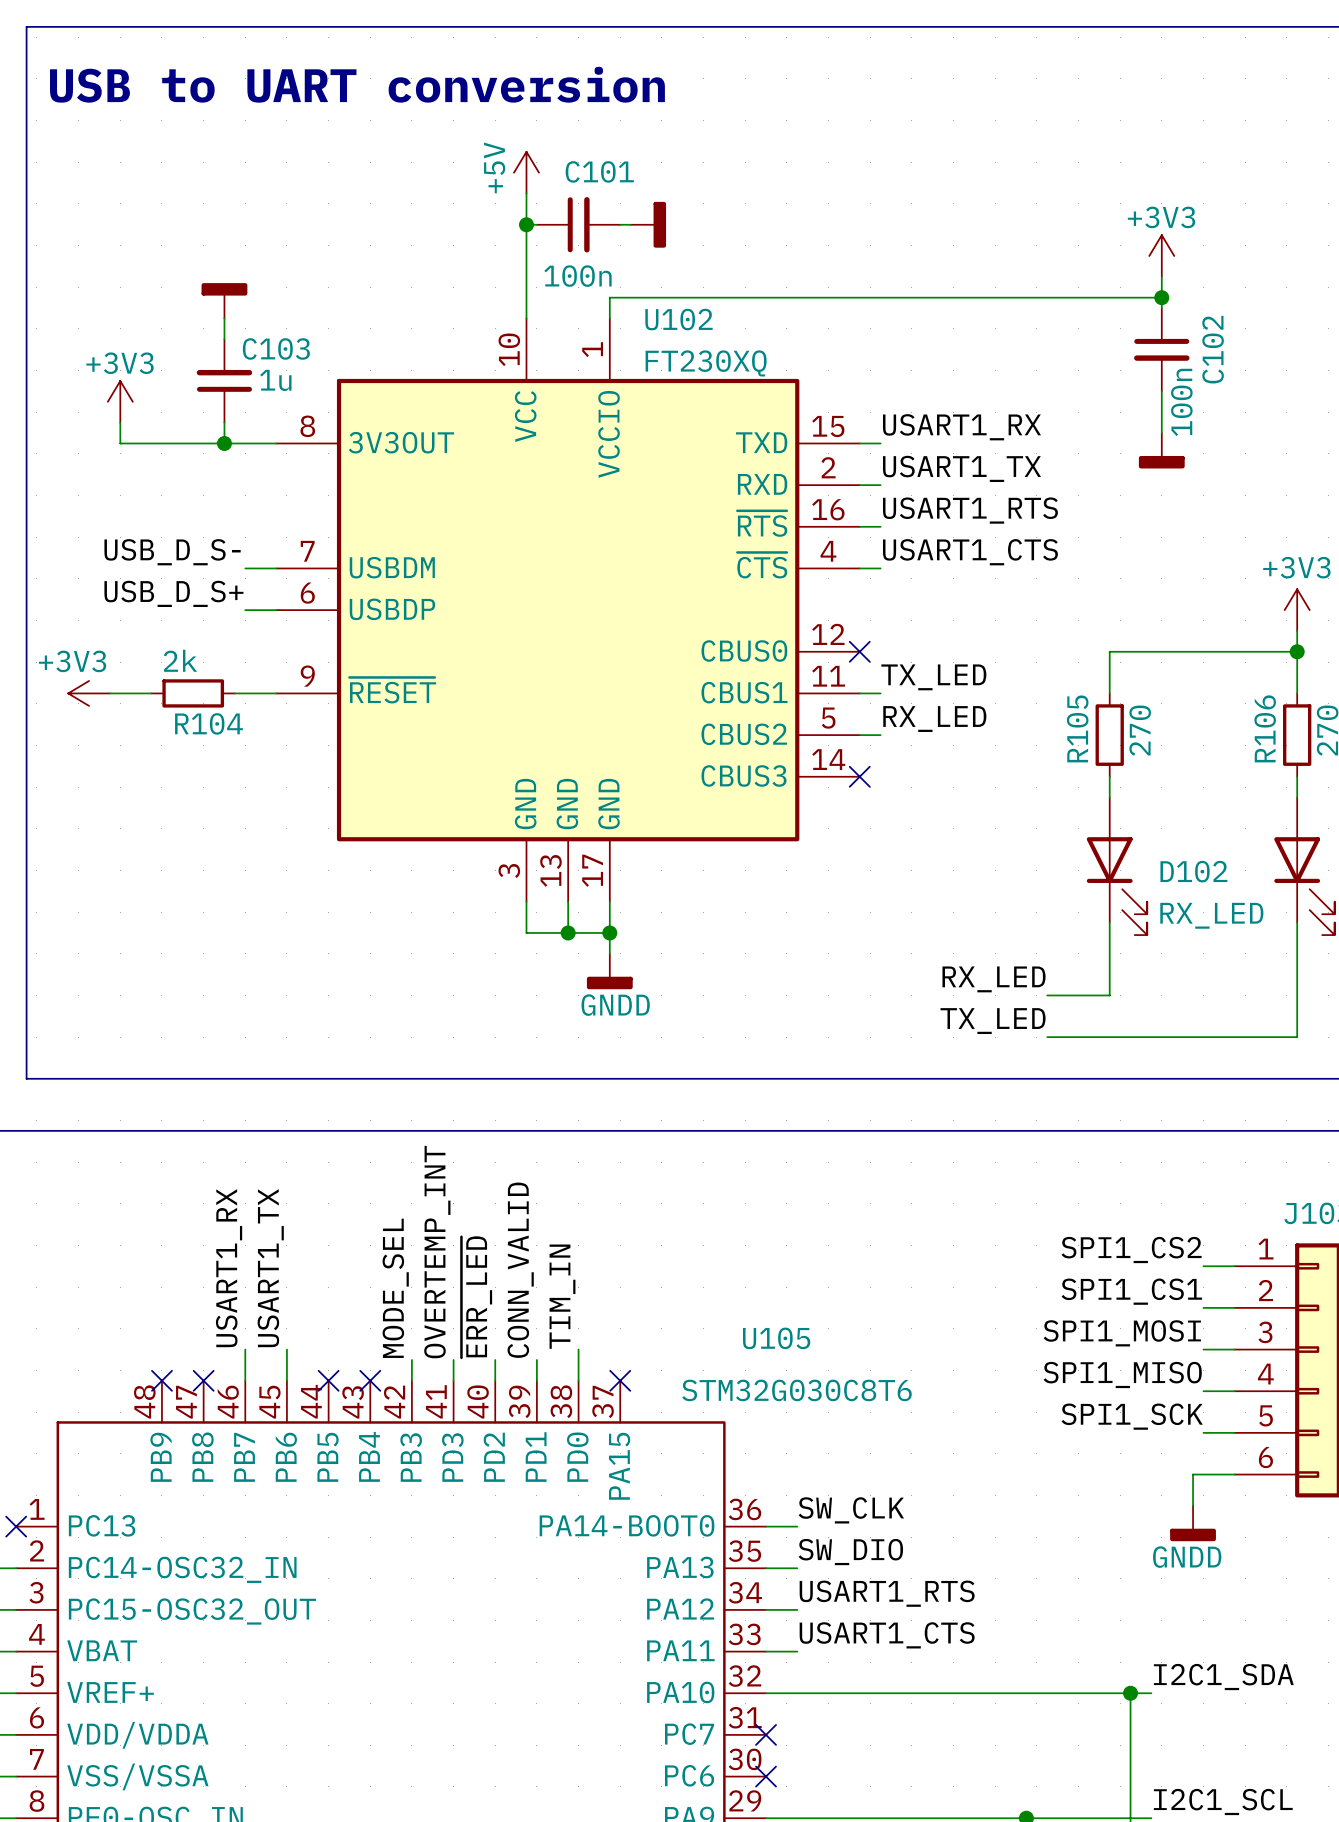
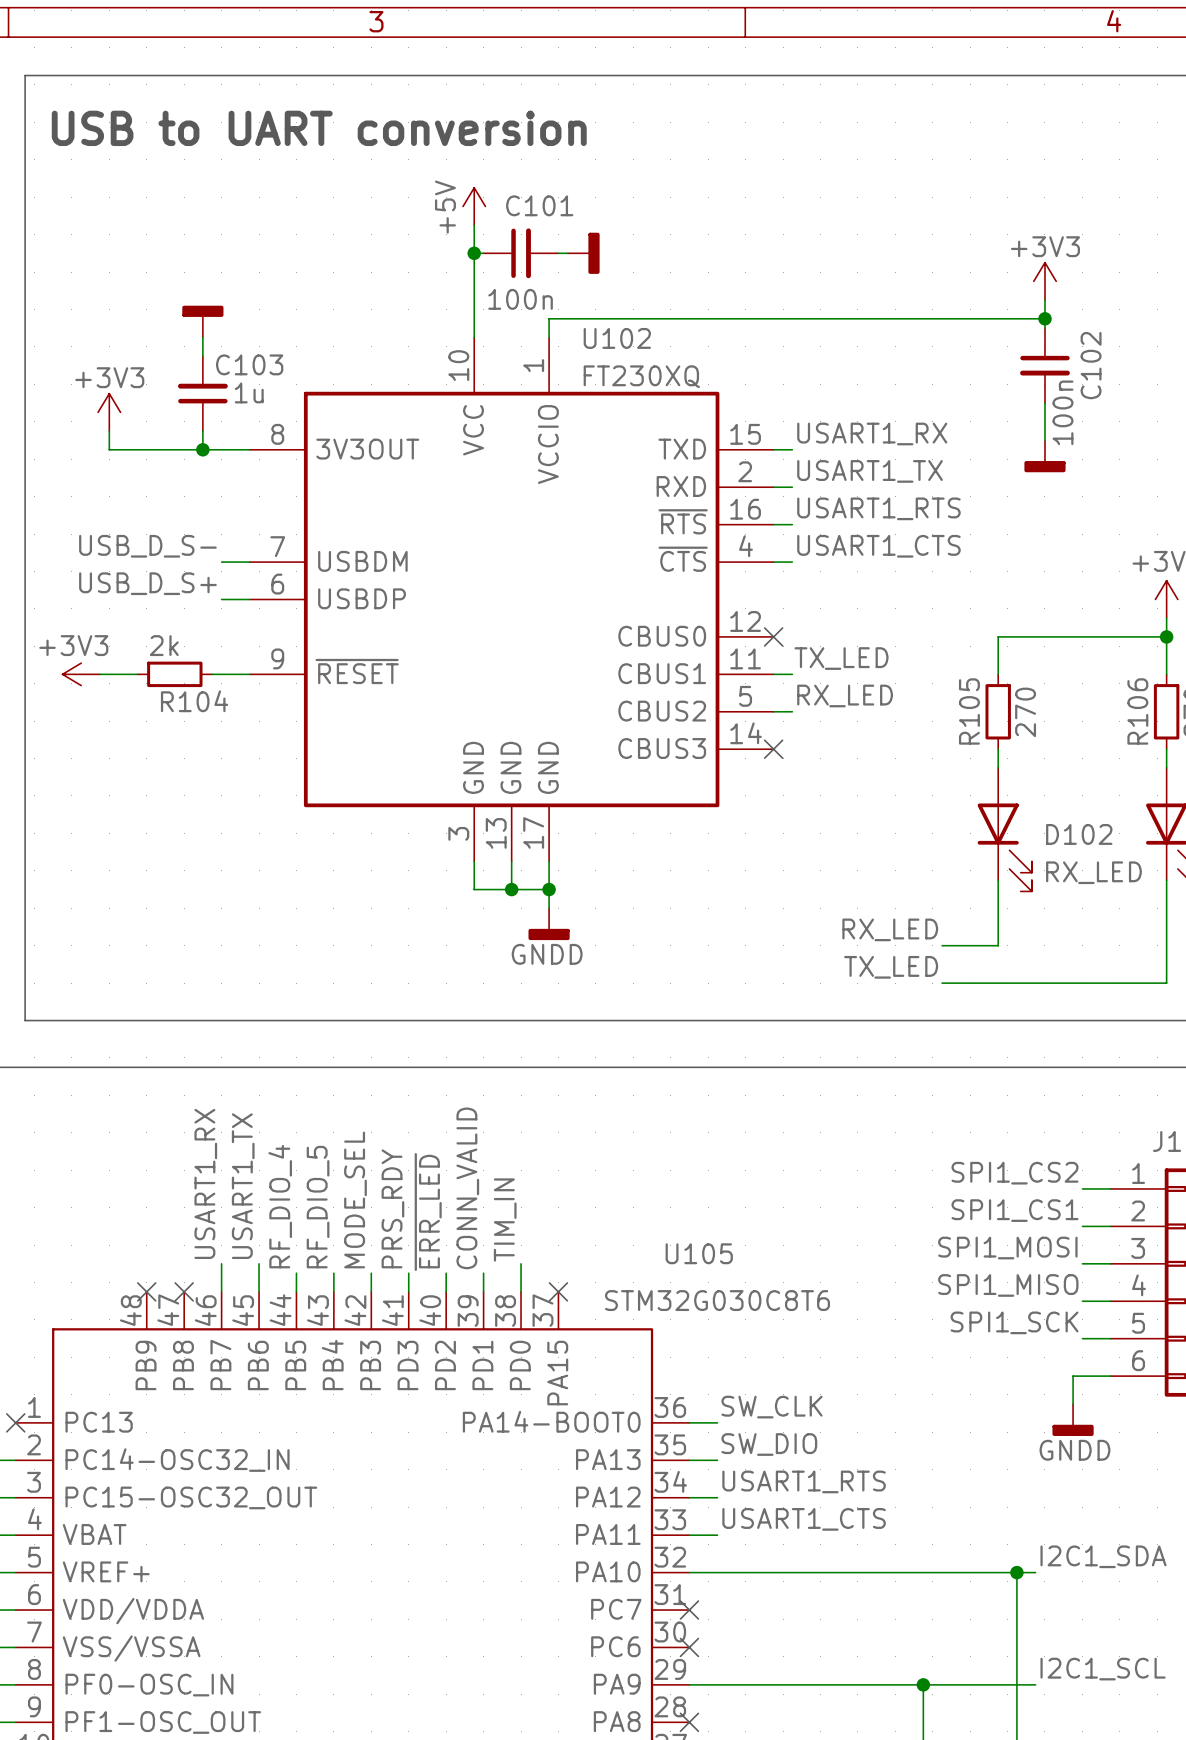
label: OVERTEMP_INT (437, 1252) -> PRS_RDY (392, 1208)
label: none -> RF_DIO_4 (280, 1206)
label: none -> RF_DIO_5 (318, 1207)
wire: none -> (296, 1273) (296, 1291)
wire: none -> (333, 1273) (333, 1291)
no-connect mark: (328, 1380) -> none
no-connect mark: (370, 1380) -> none

